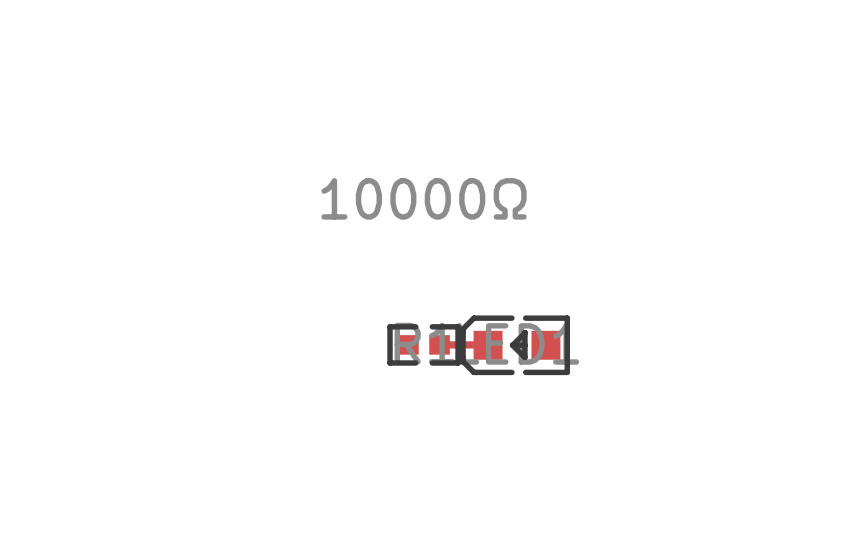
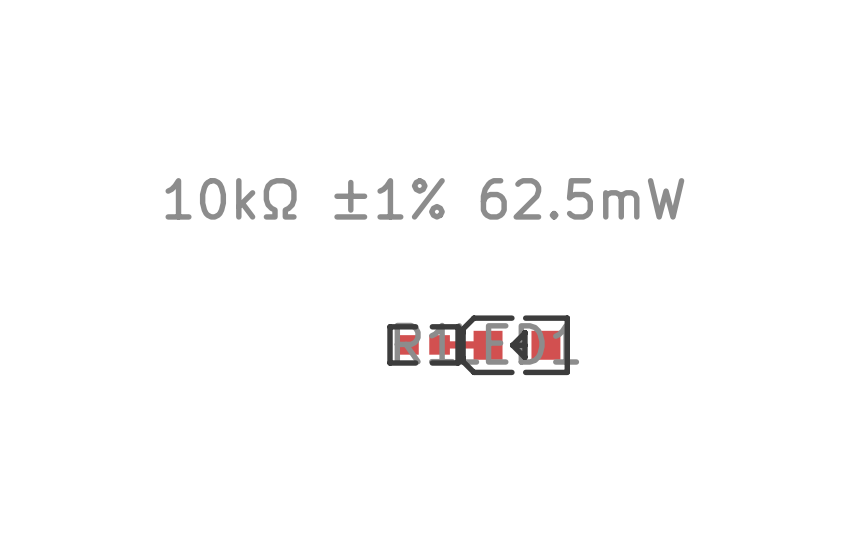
part value: 10000Ω (424, 198) -> 10kΩ ±1% 62.5mW (424, 198)

